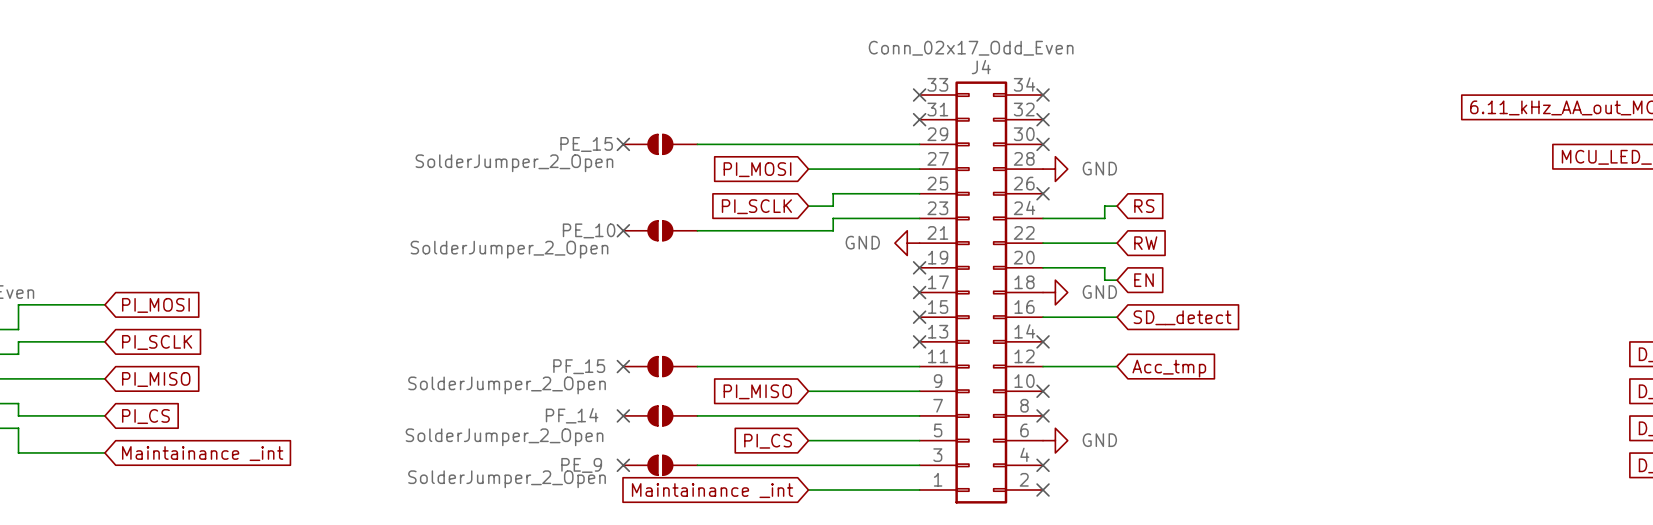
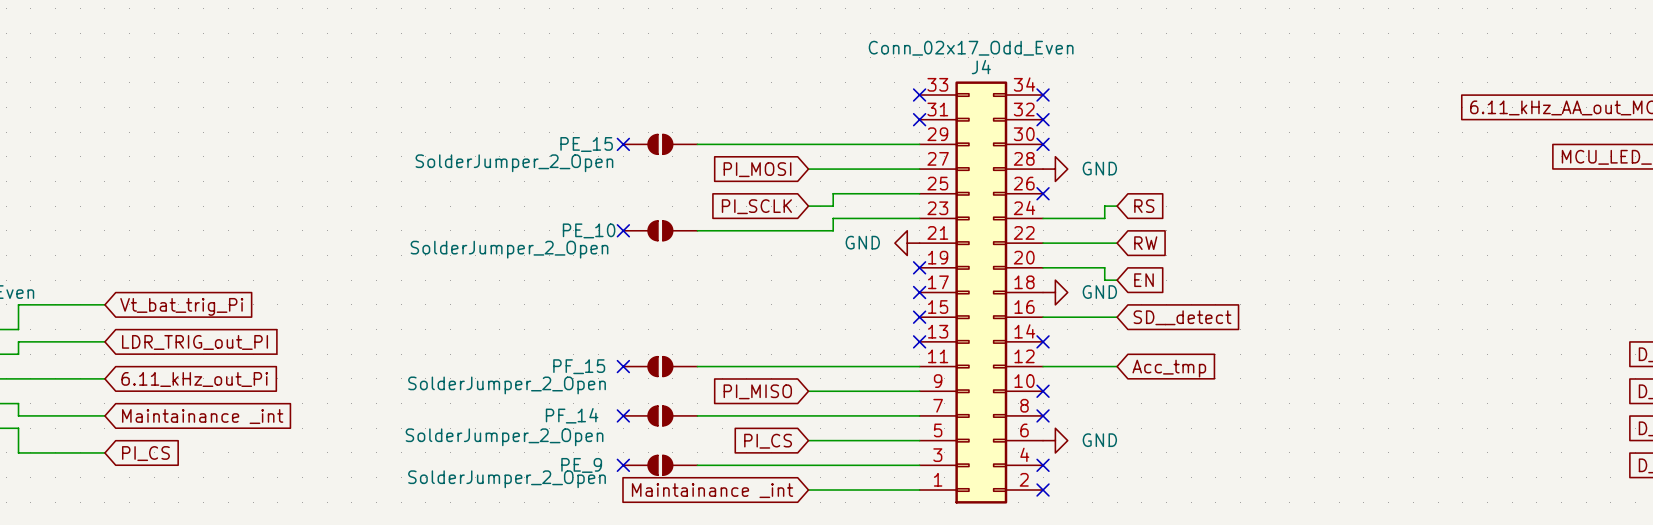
global label: PI_MOSI (155, 305) -> Vt_bat_trig_Pi (181, 306)
global label: PI_SCLK (157, 342) -> LDR_TRIG_out_PI (195, 342)
global label: PI_MISO (156, 379) -> 6.11_kHz_out_Pi (194, 379)
global label: PI_CS (145, 416) -> Maintainance _int (202, 416)
global label: Maintainance _int (202, 453) -> PI_CS (145, 453)

